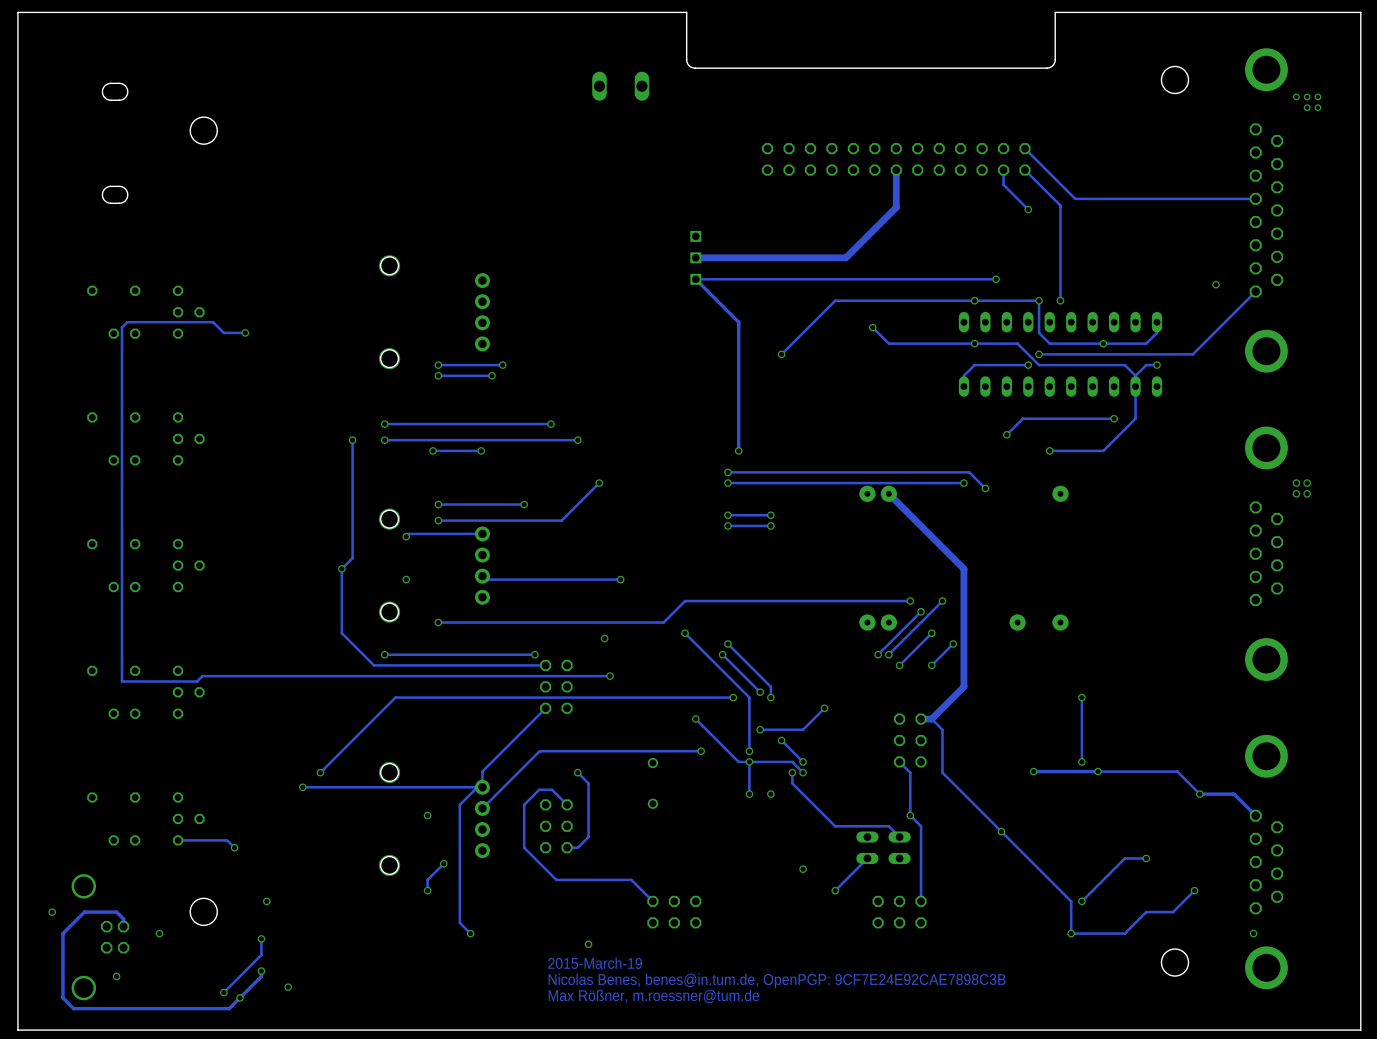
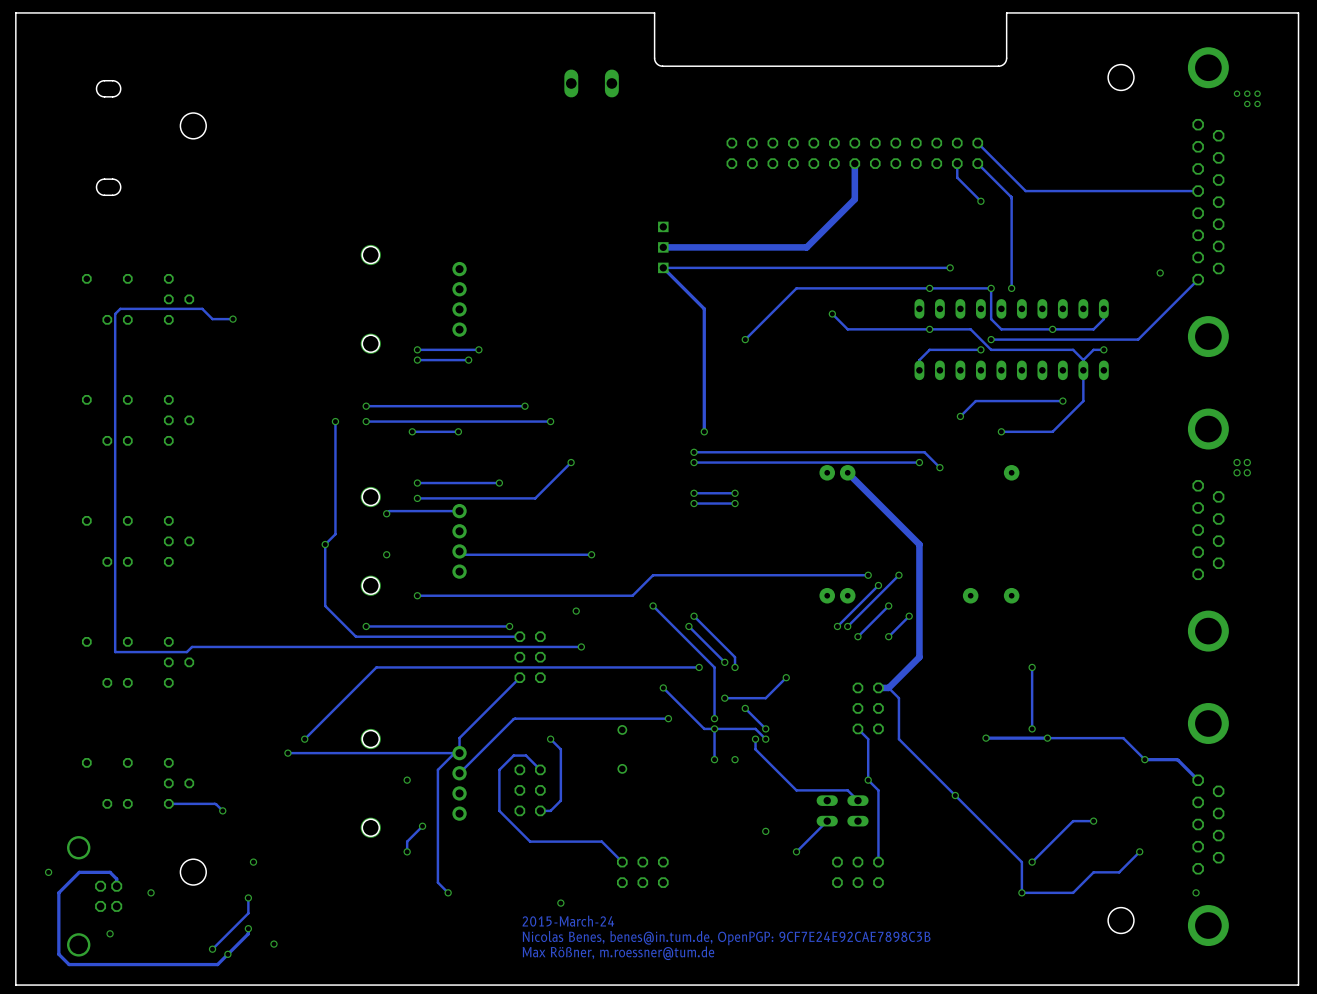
text: 2015-March-19 (595, 963) -> 2015-March-24 (568, 921)

